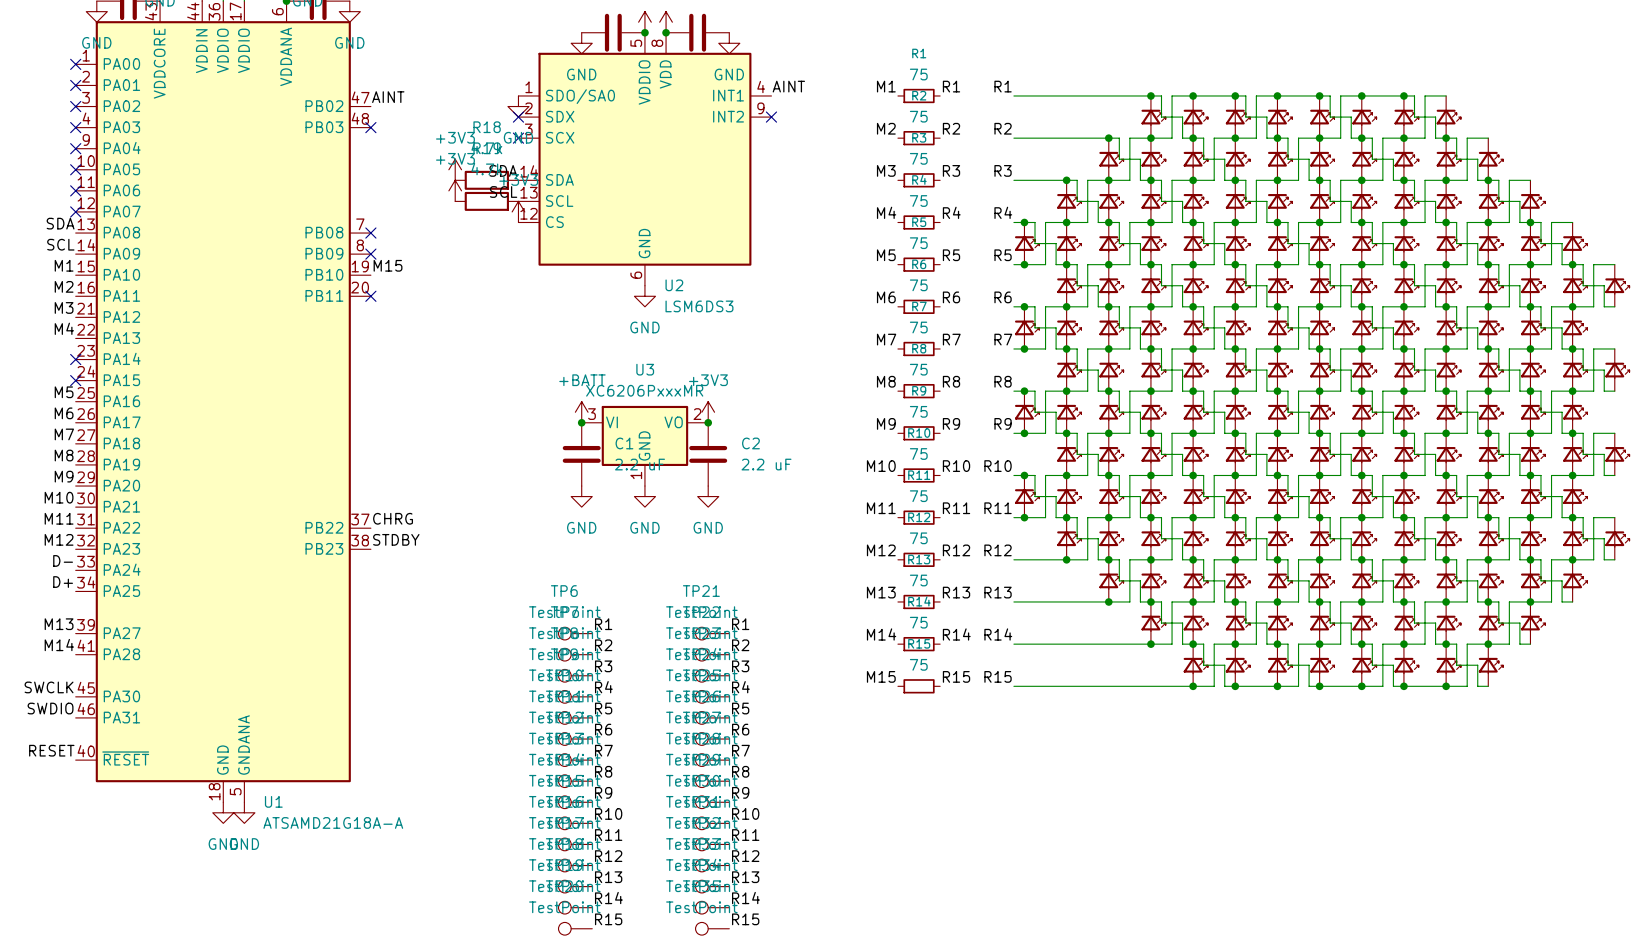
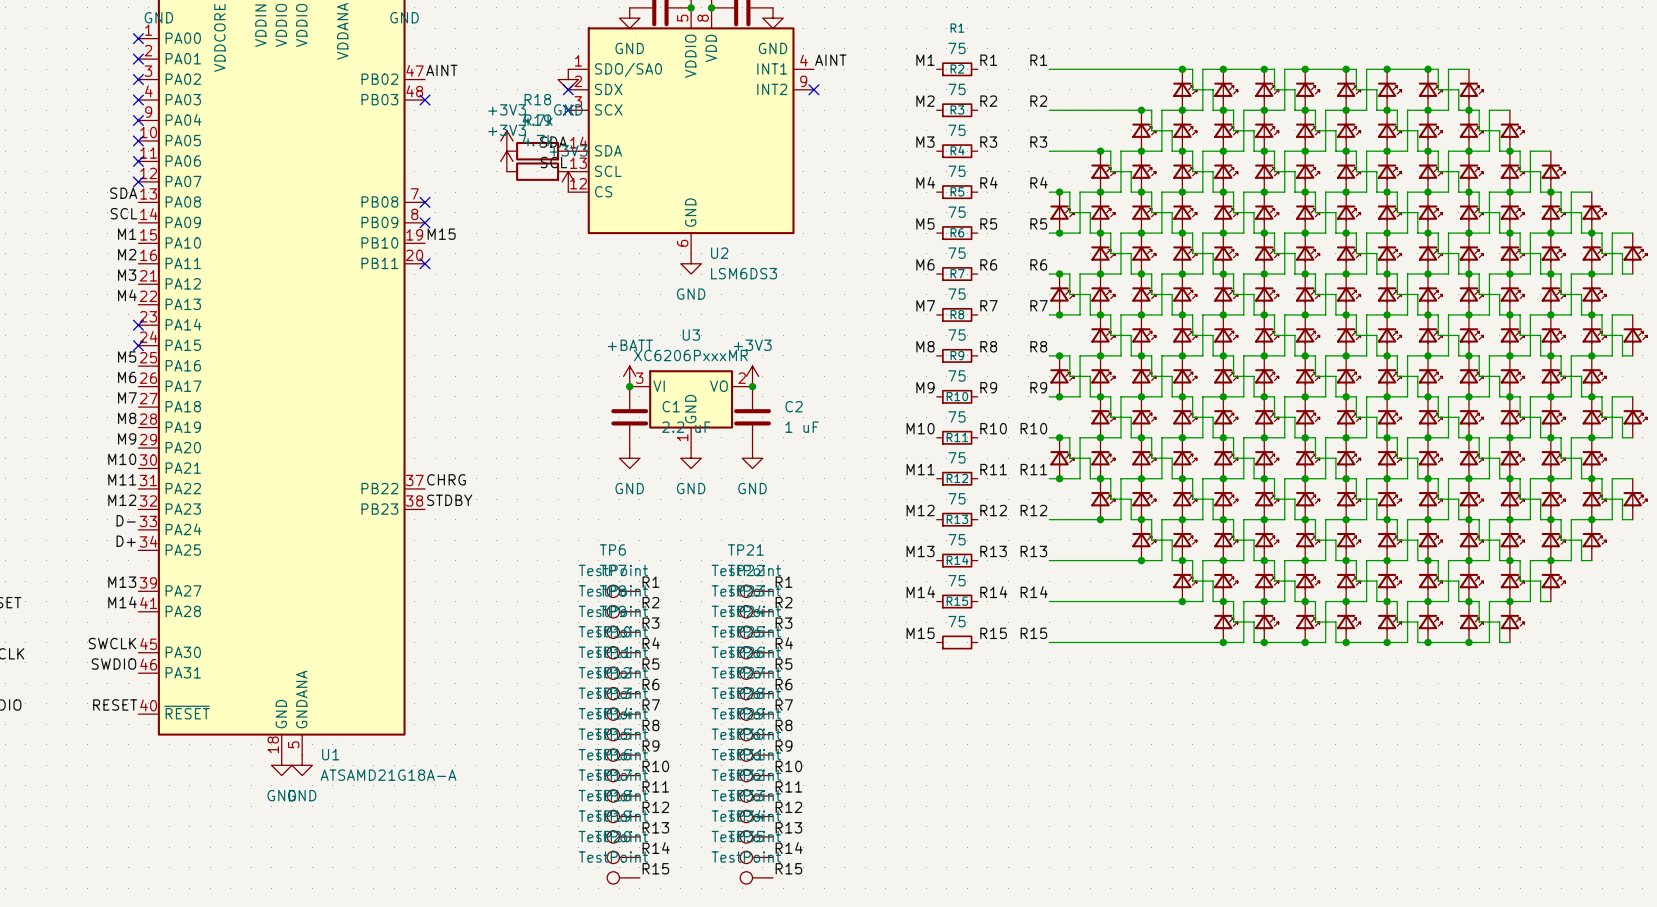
C2 value: 2.2 uF (766, 464) -> 1 uF (802, 427)

